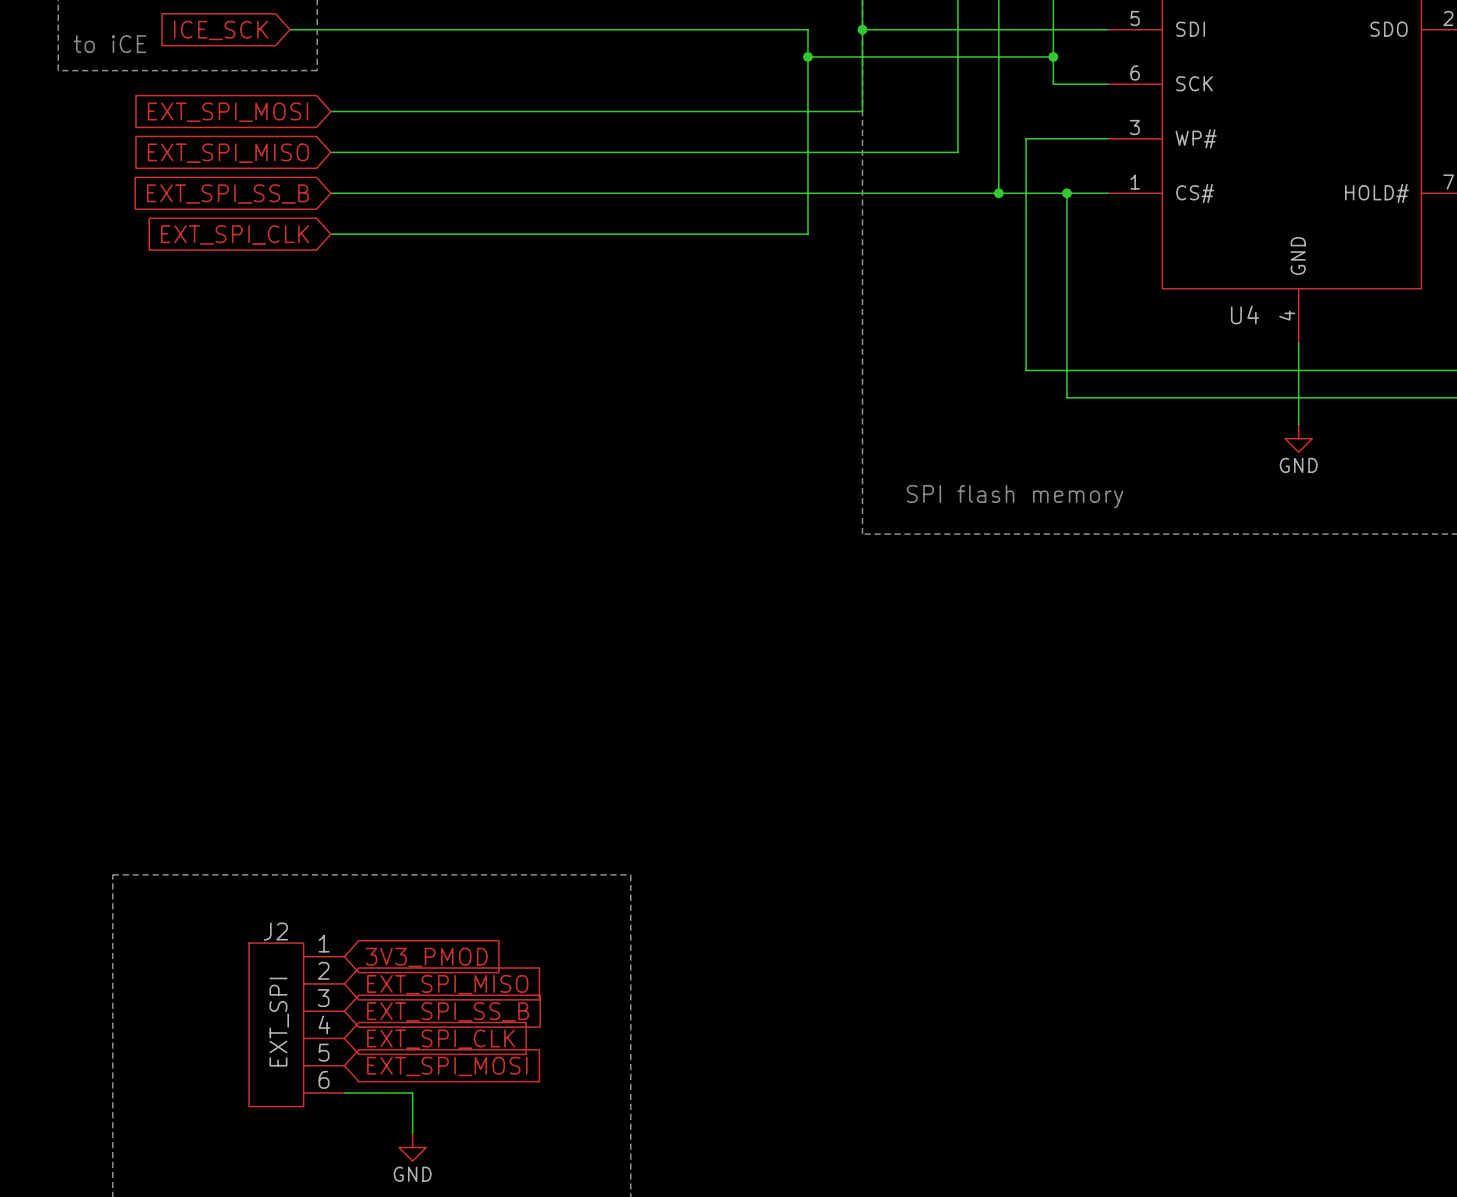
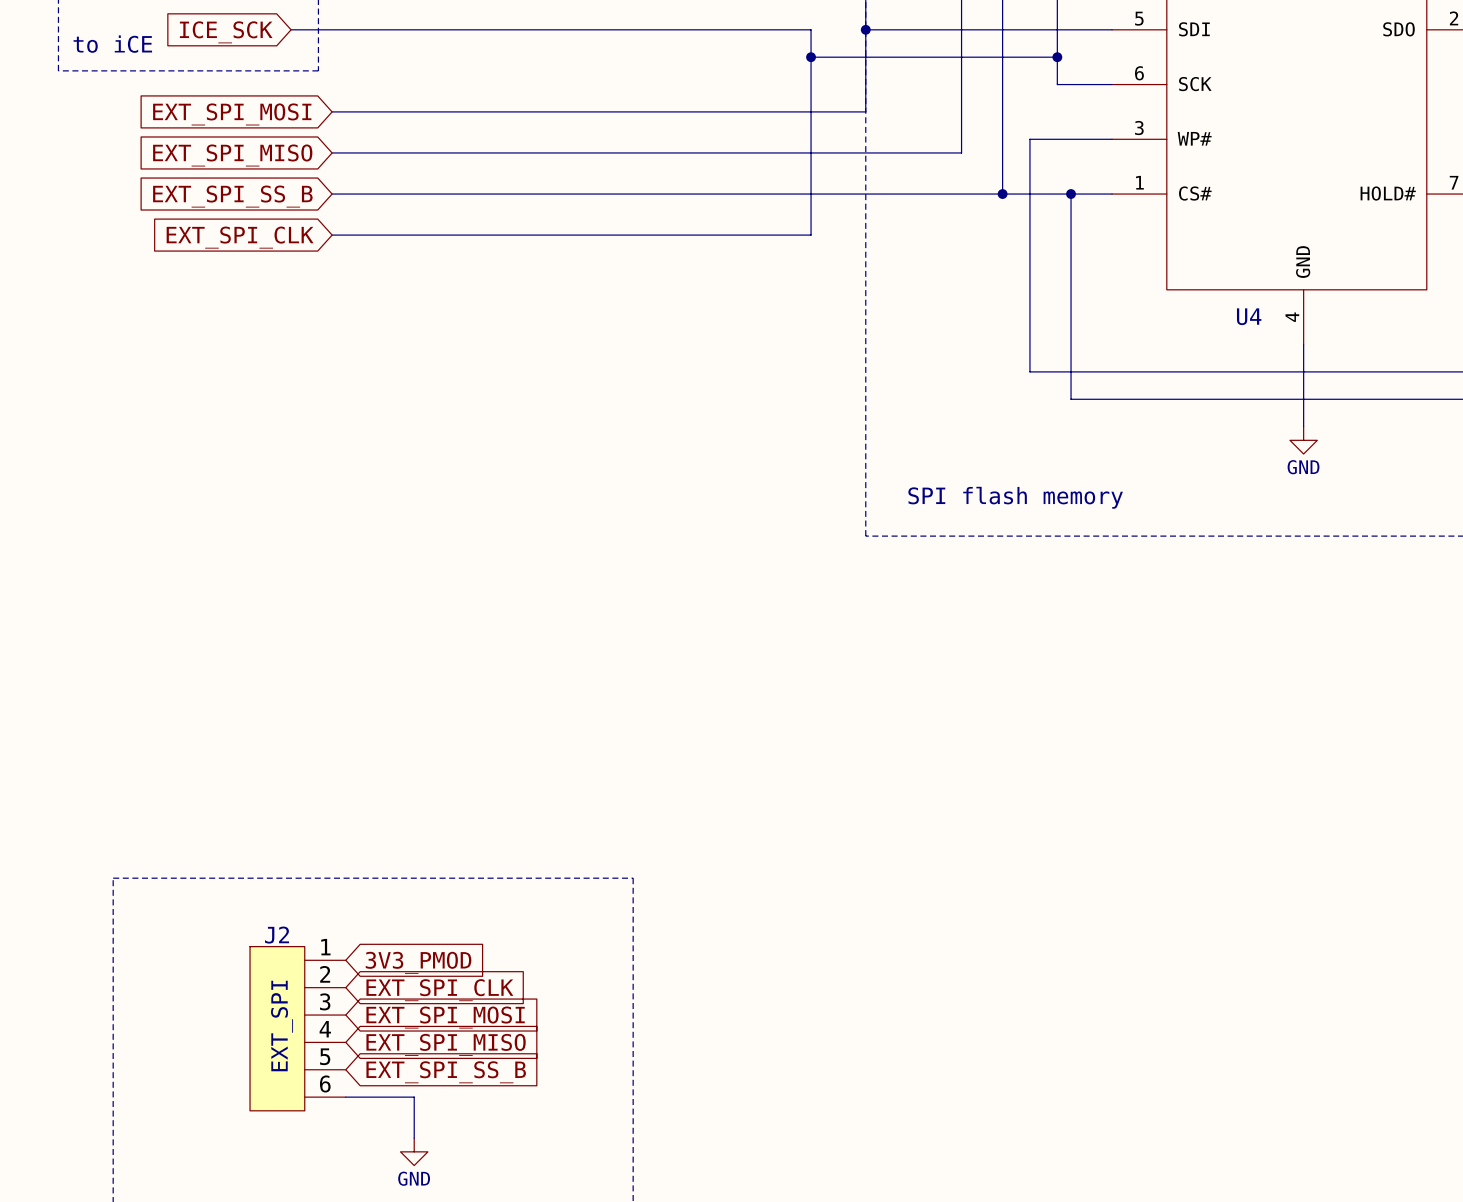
global label: EXT_SPI_MISO (447, 984) -> EXT_SPI_CLK (439, 990)
global label: EXT_SPI_SS_B (448, 1011) -> EXT_SPI_MOSI (445, 1017)
global label: EXT_SPI_CLK (441, 1039) -> EXT_SPI_MISO (446, 1044)
global label: EXT_SPI_MOSI (447, 1066) -> EXT_SPI_SS_B (446, 1072)

